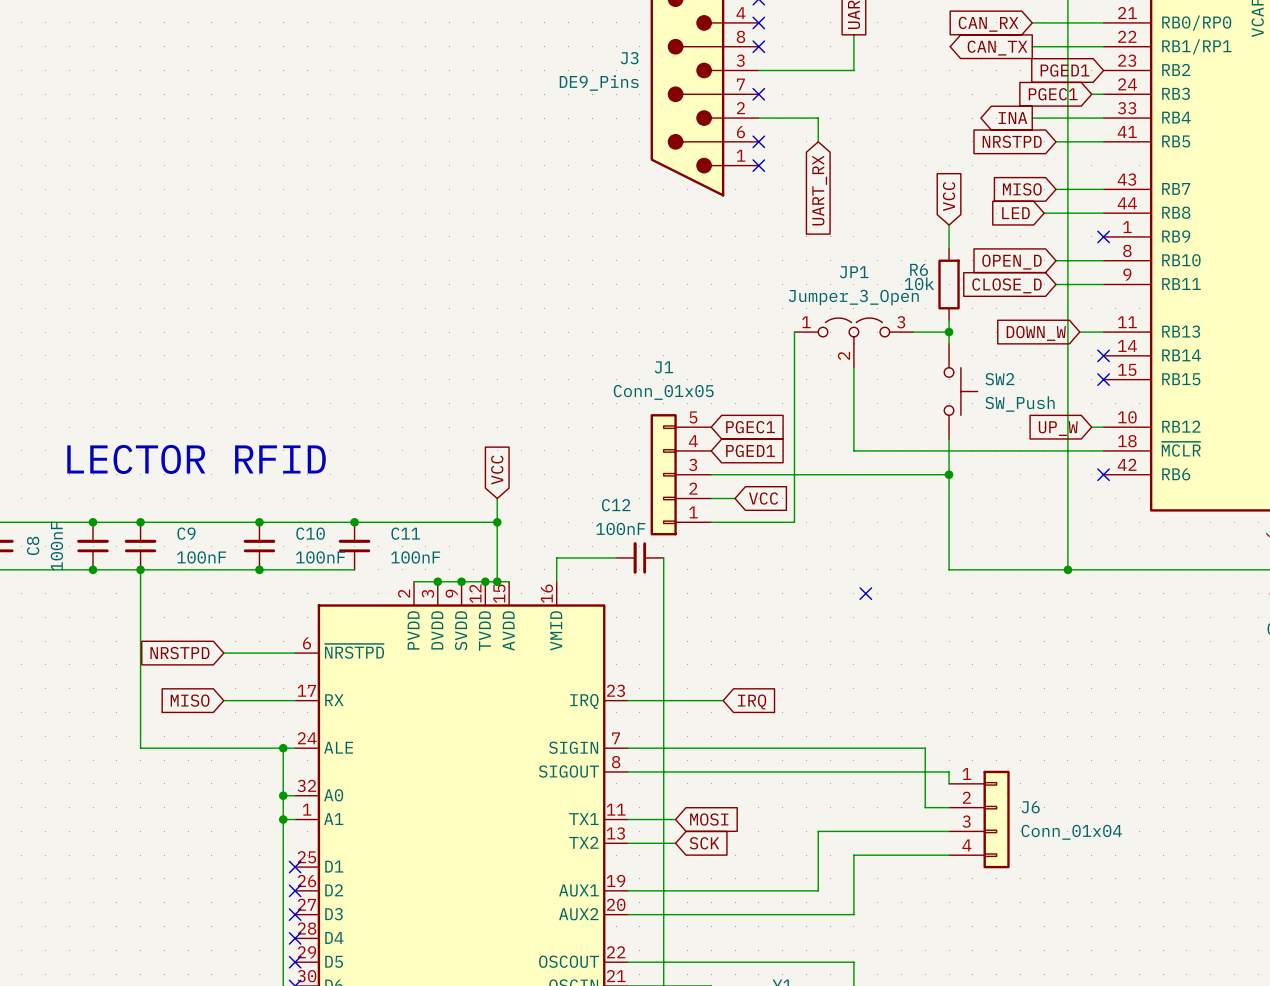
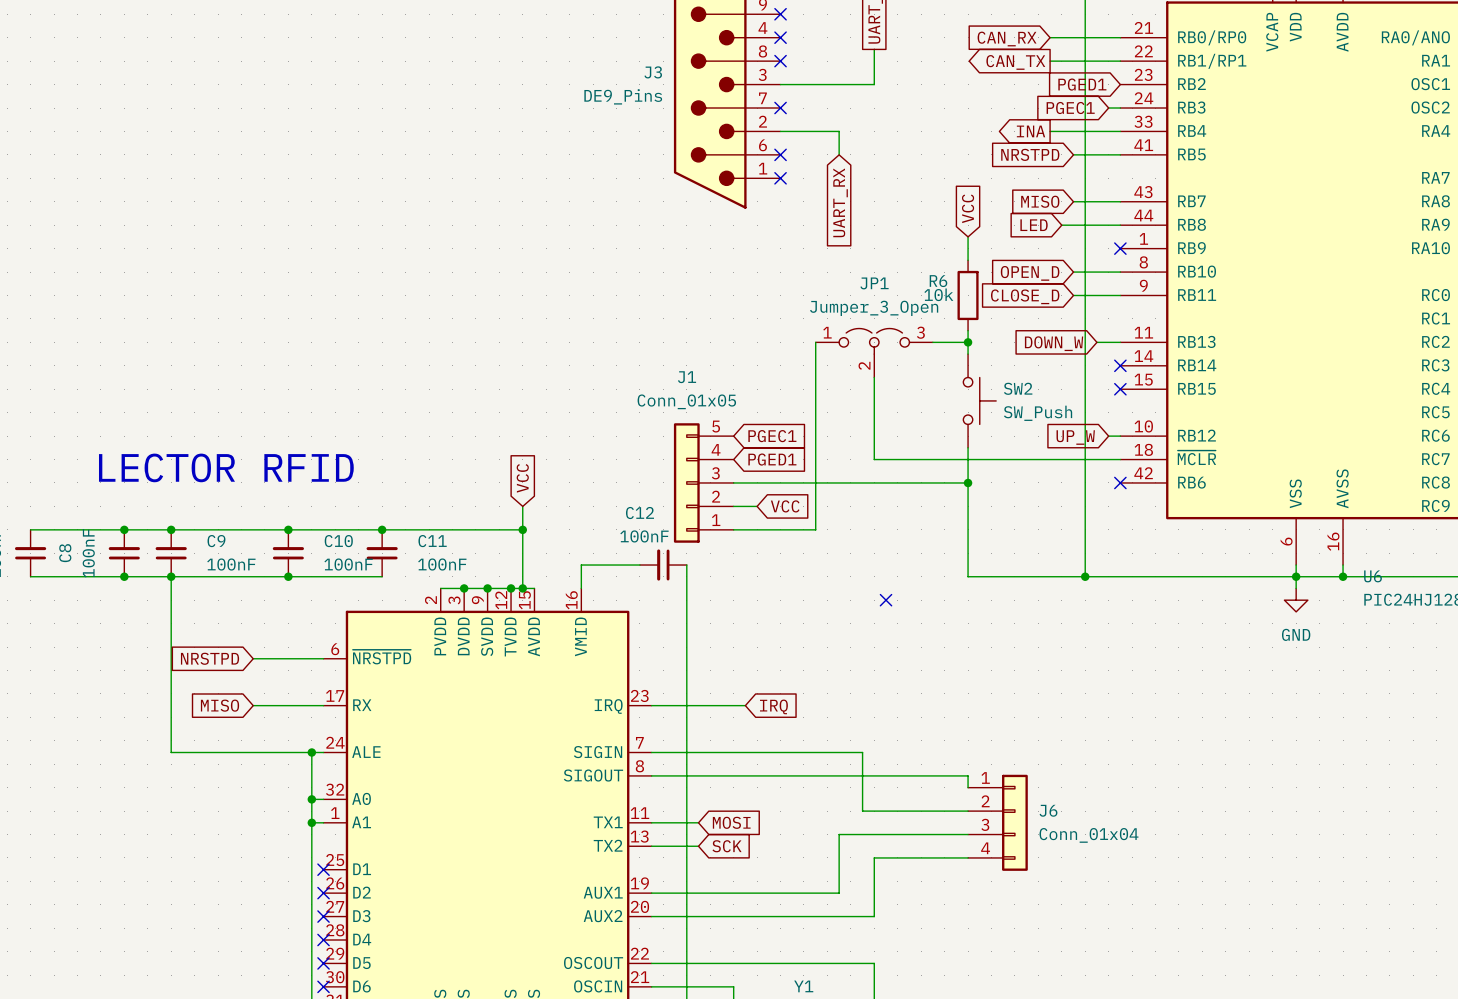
wire: (842, 748) (925, 748) (925, 807) -> (862, 752) (862, 811) (944, 811)

